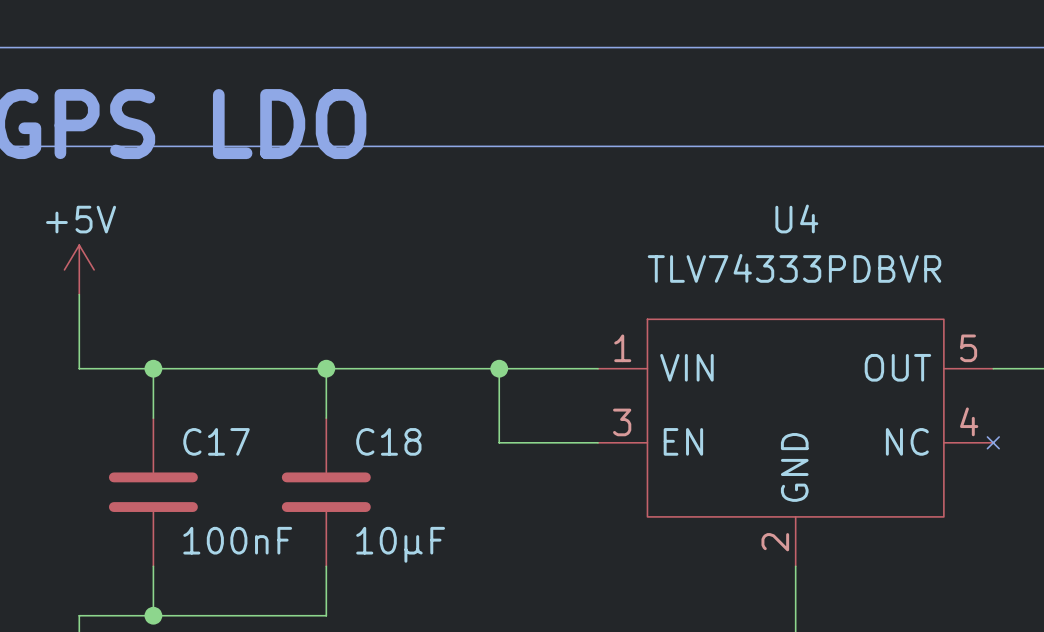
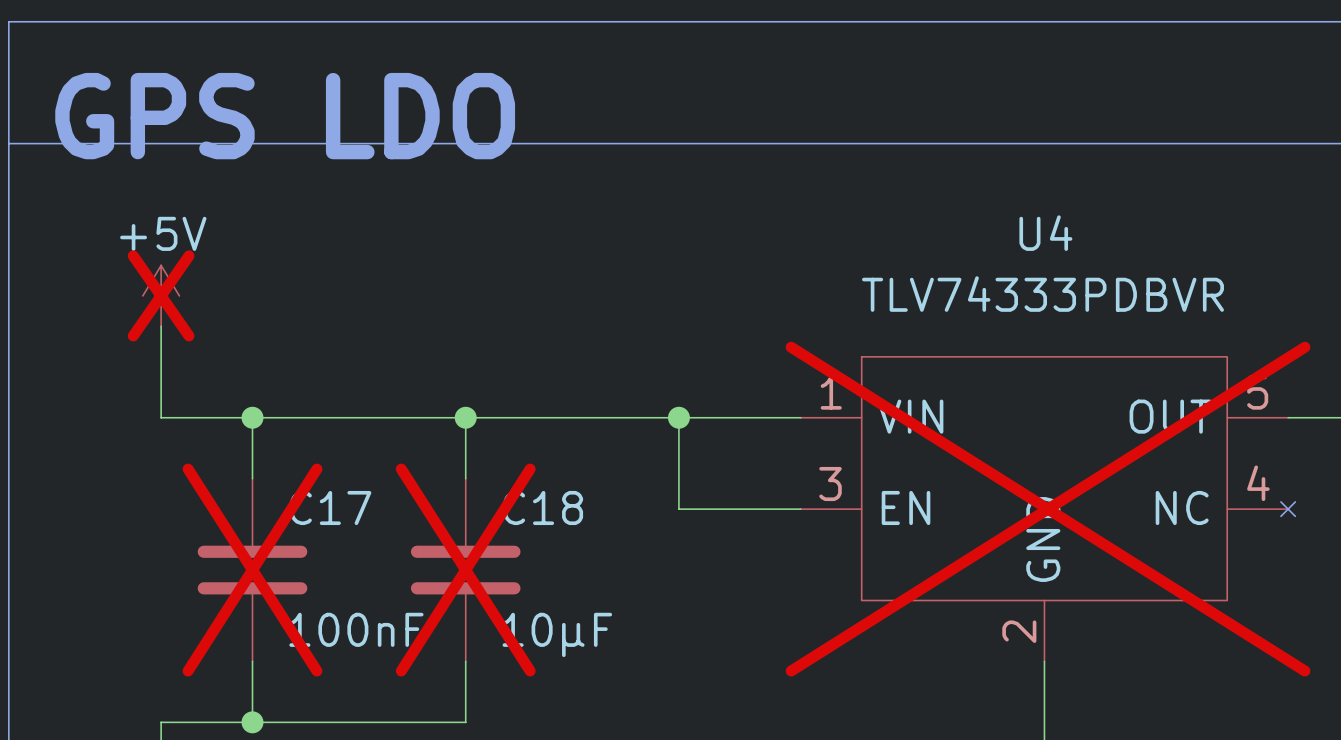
power symbol do-not-place cross: none -> (161, 295)
U4 do-not-place cross: none -> (1048, 509)
C17 do-not-place cross: none -> (252, 570)
C18 do-not-place cross: none -> (465, 570)

